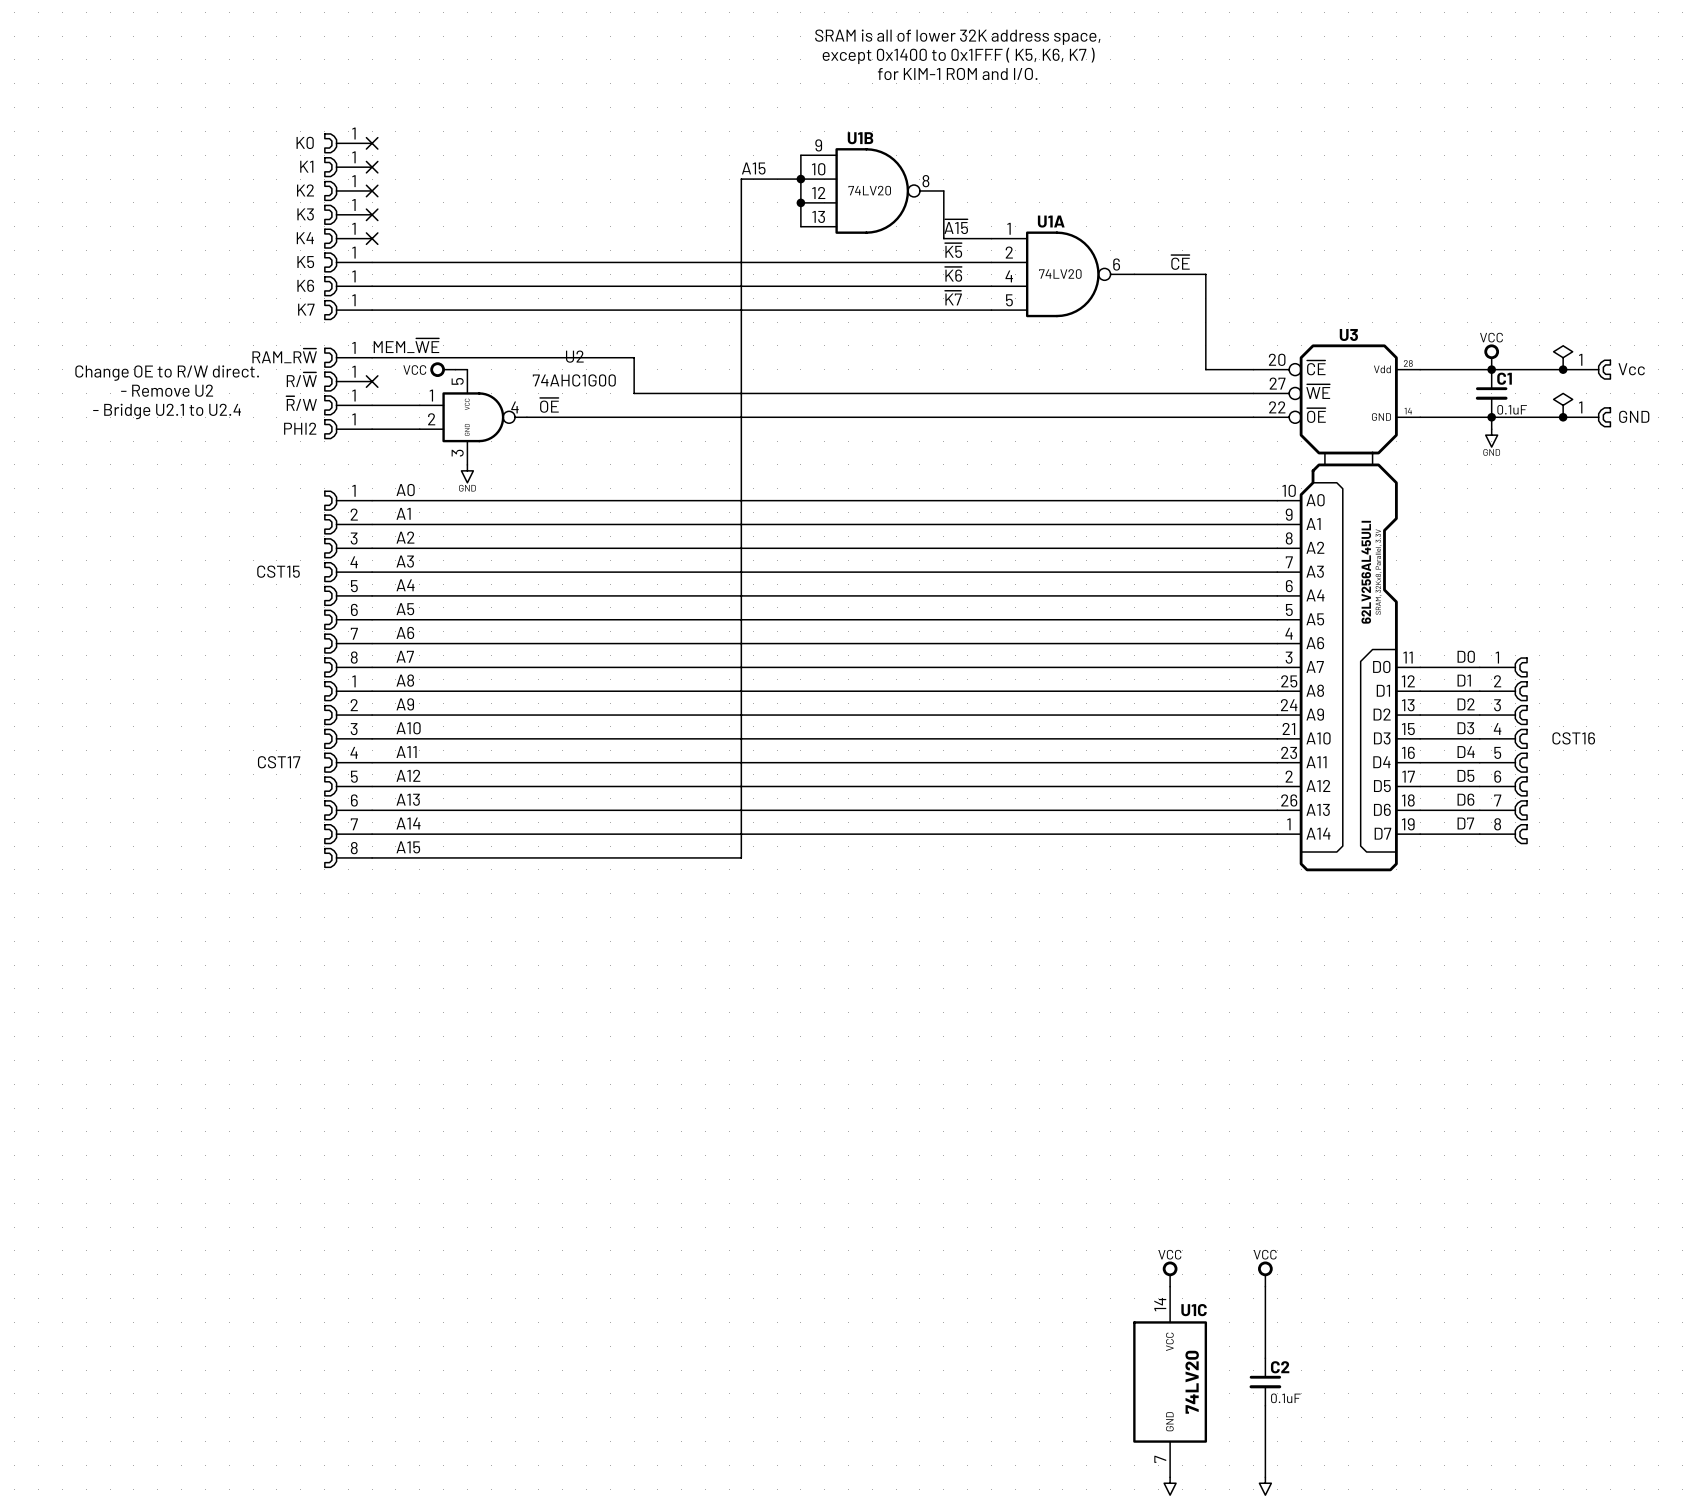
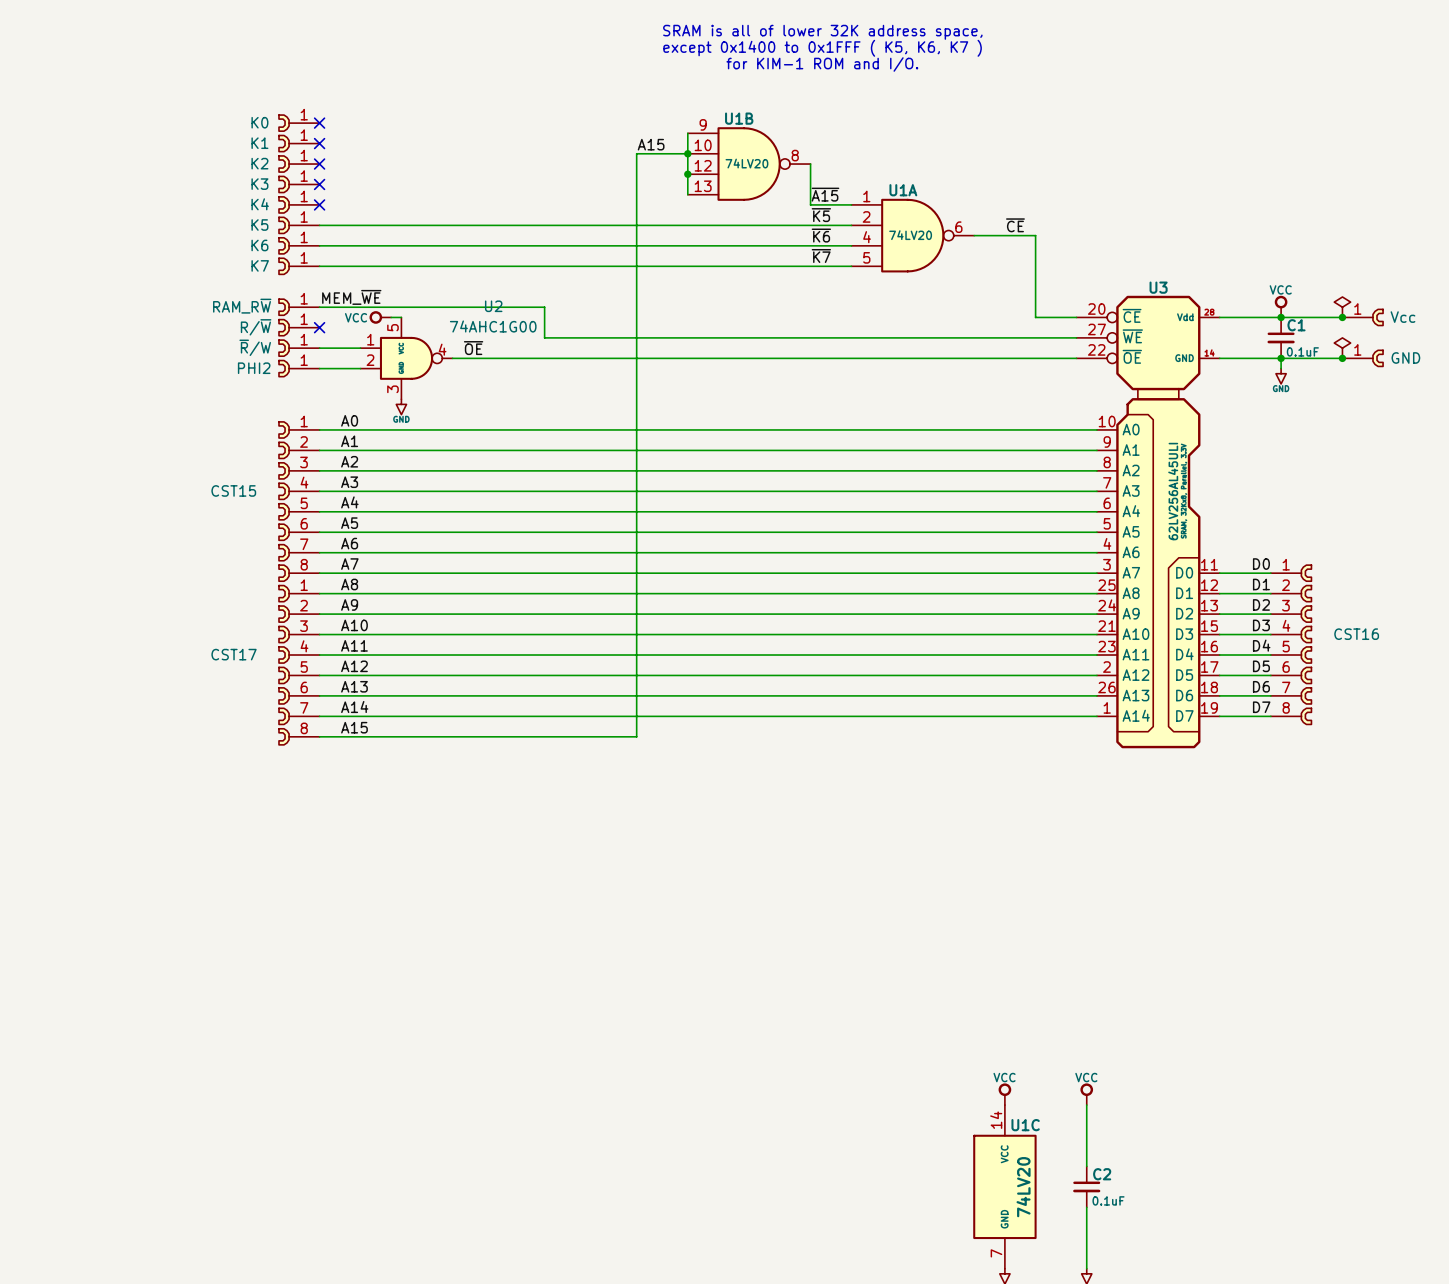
text: Change OE to R/W direct. (167, 373) -> none
text: - Remove U2 (167, 390) -> none
text: - Bridge U2.1 to U2.4 (167, 411) -> none

